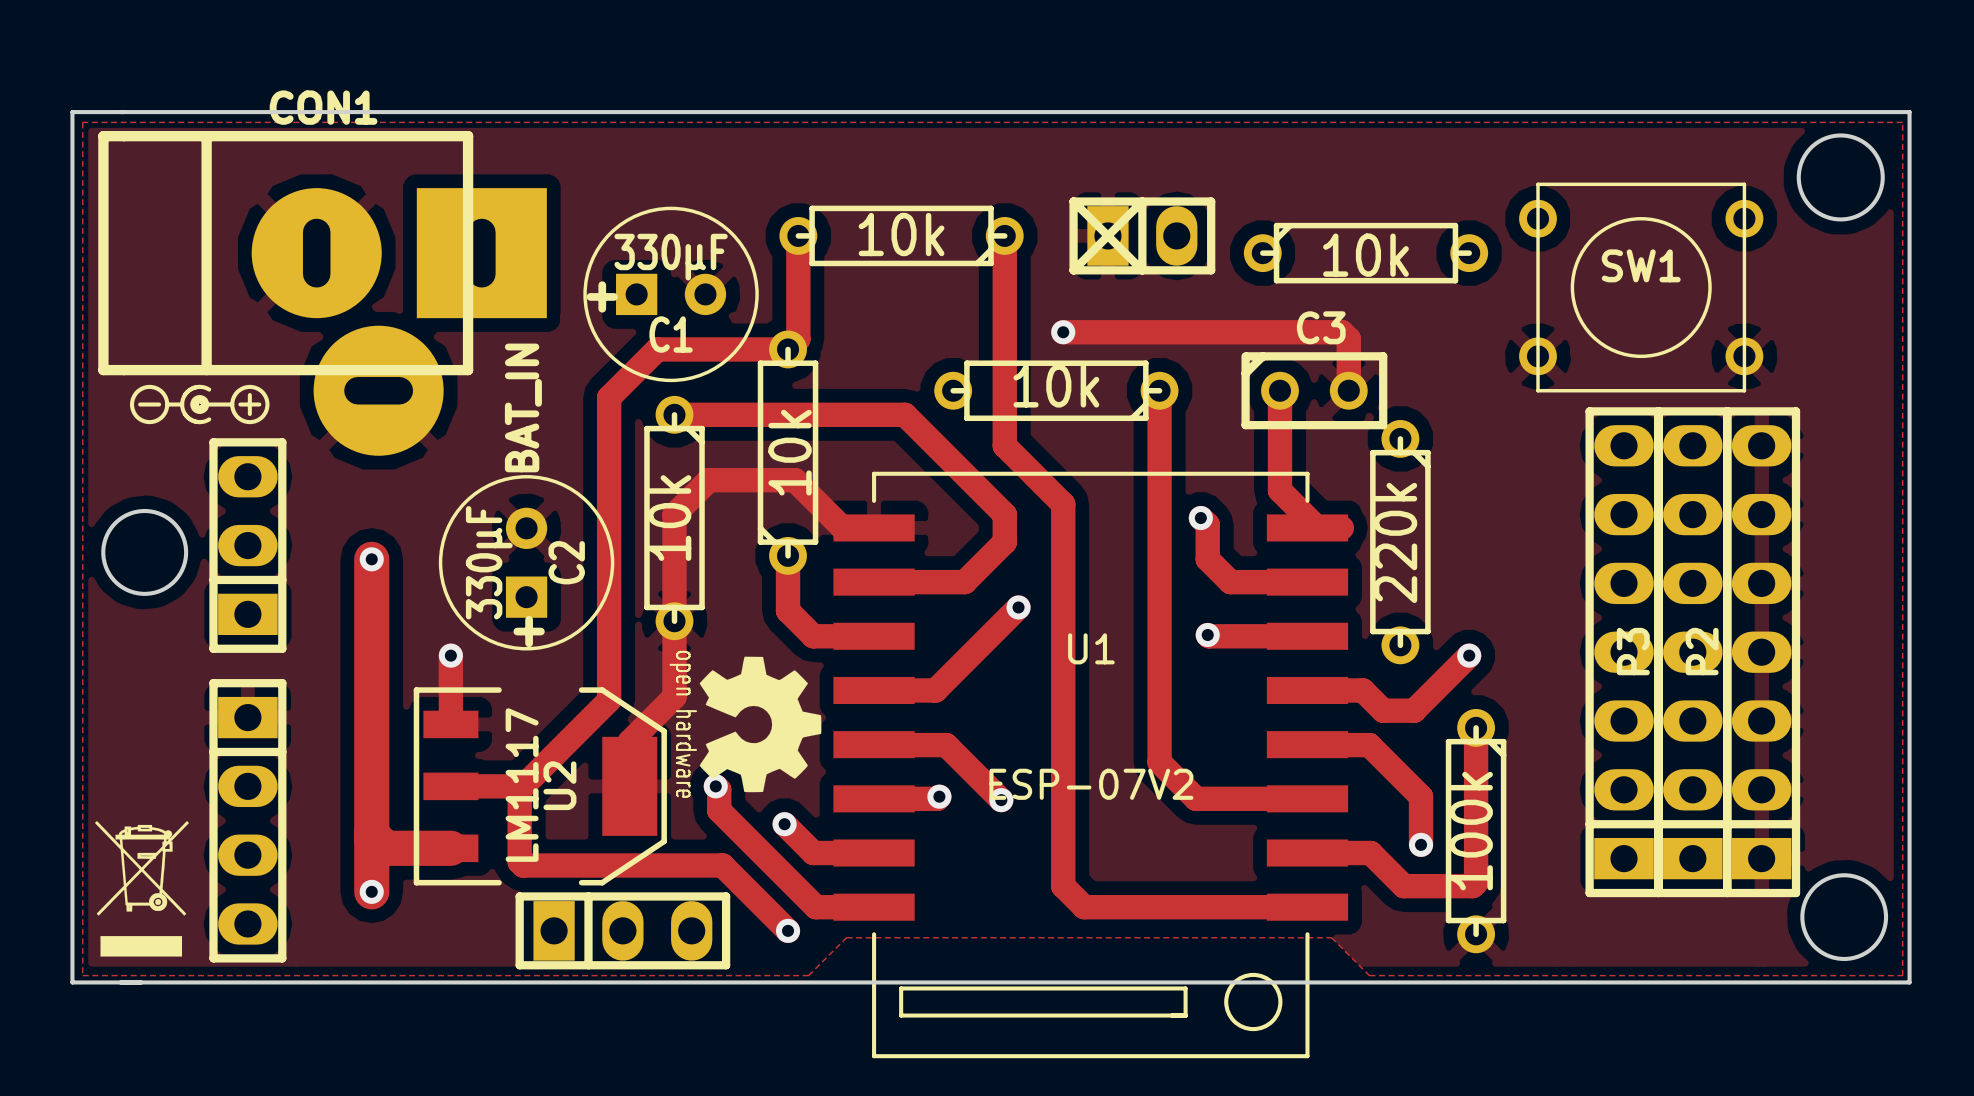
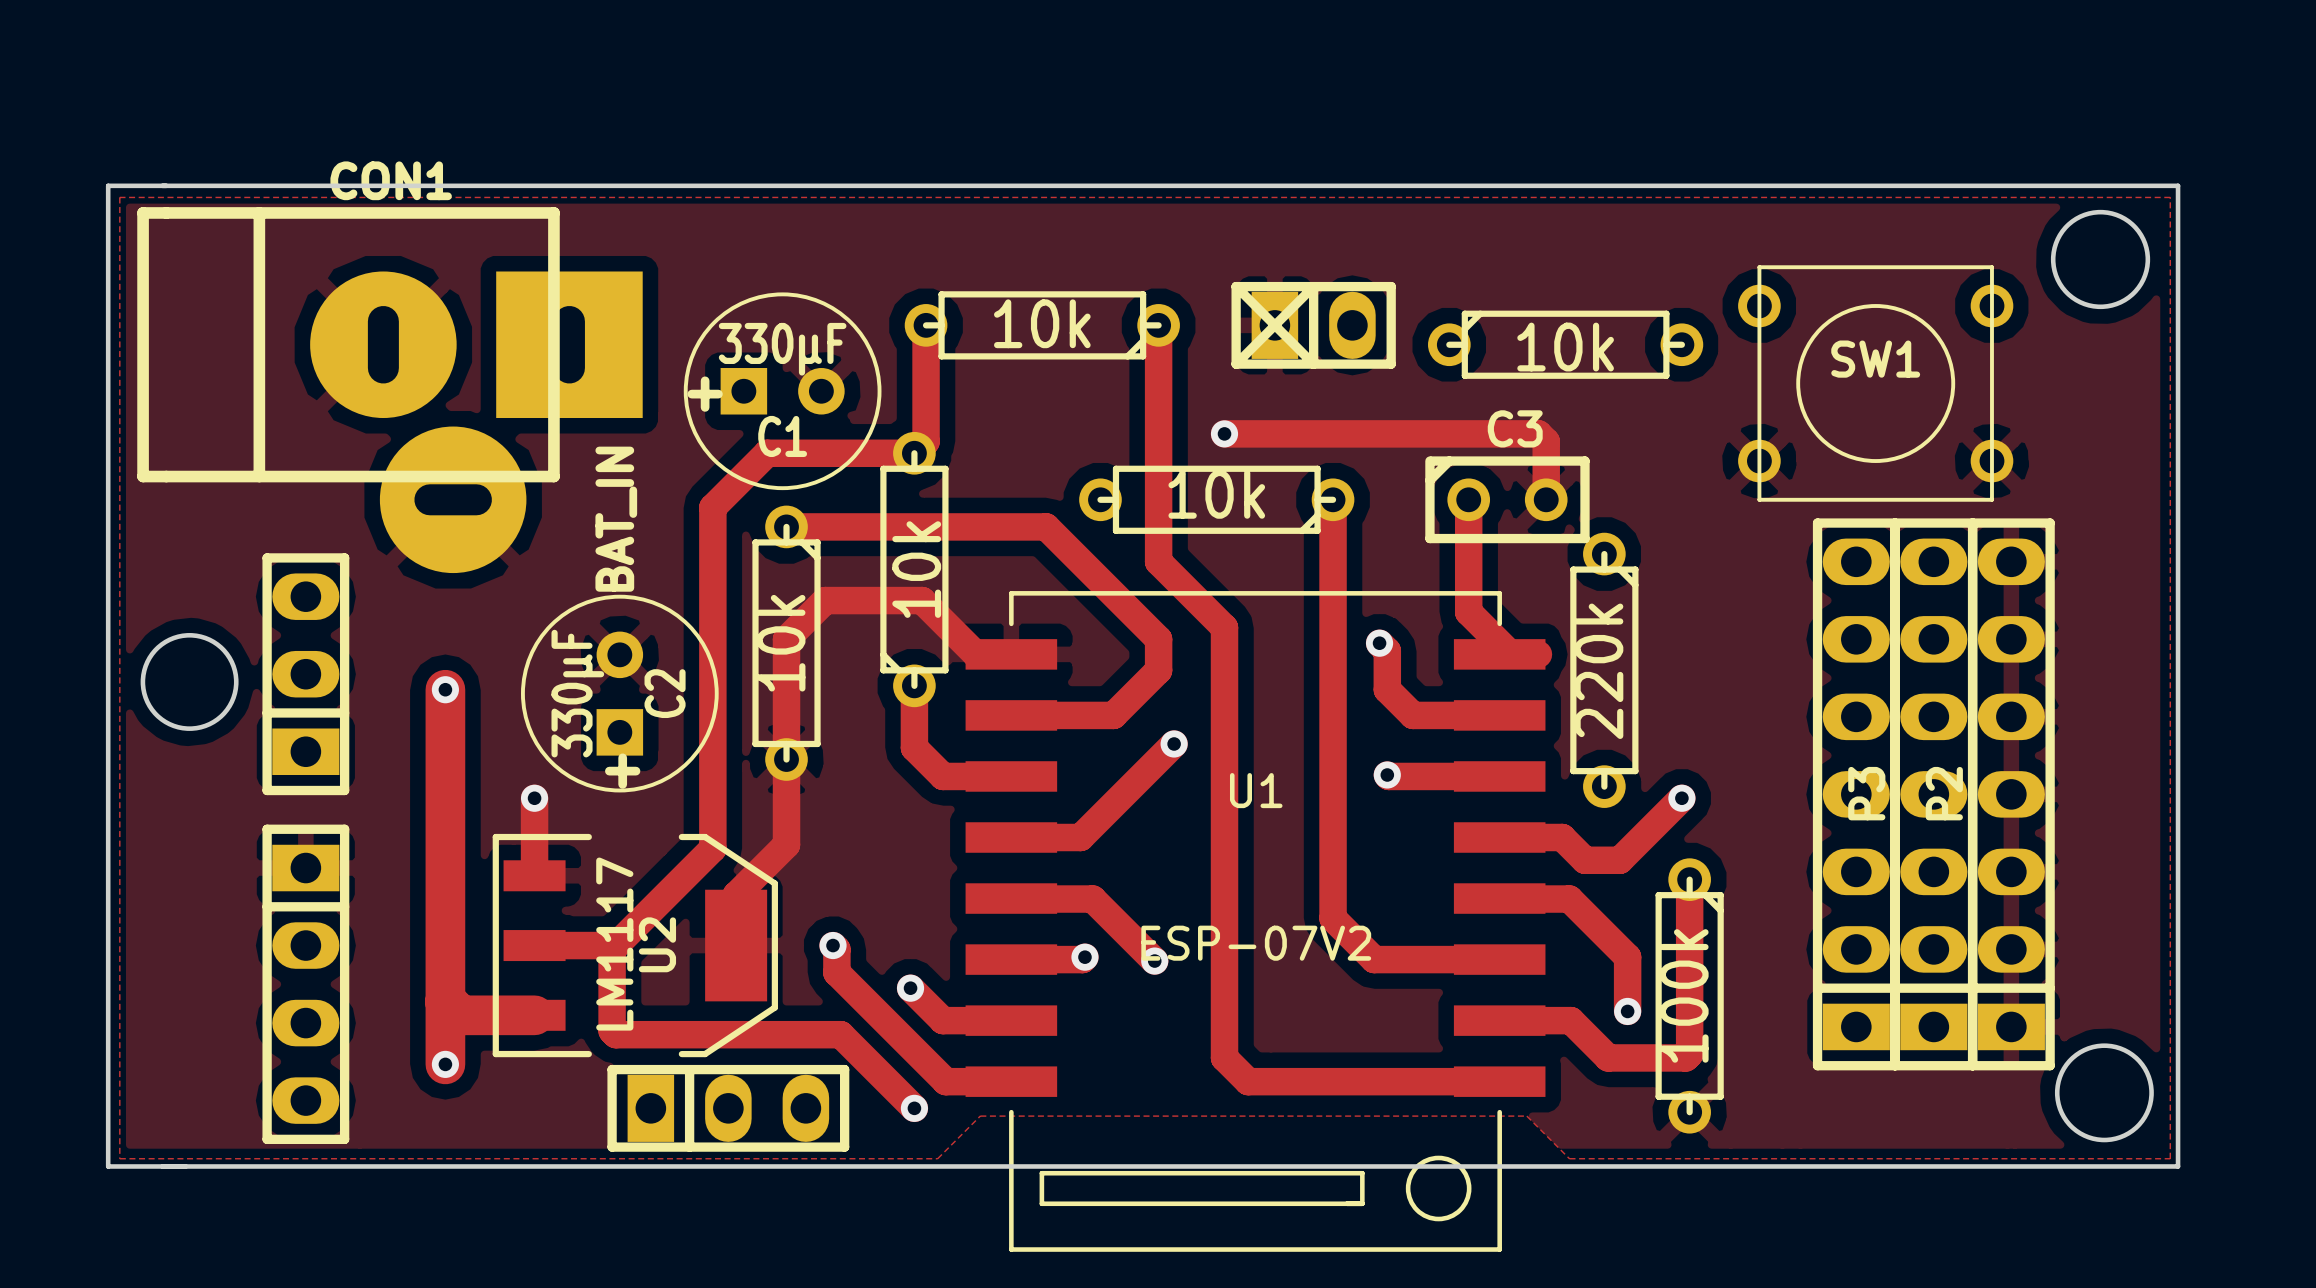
drawing: [129, 384, 270, 425] -> none
drawing: [669, 650, 822, 798] -> none
drawing: [94, 821, 189, 957] -> none

